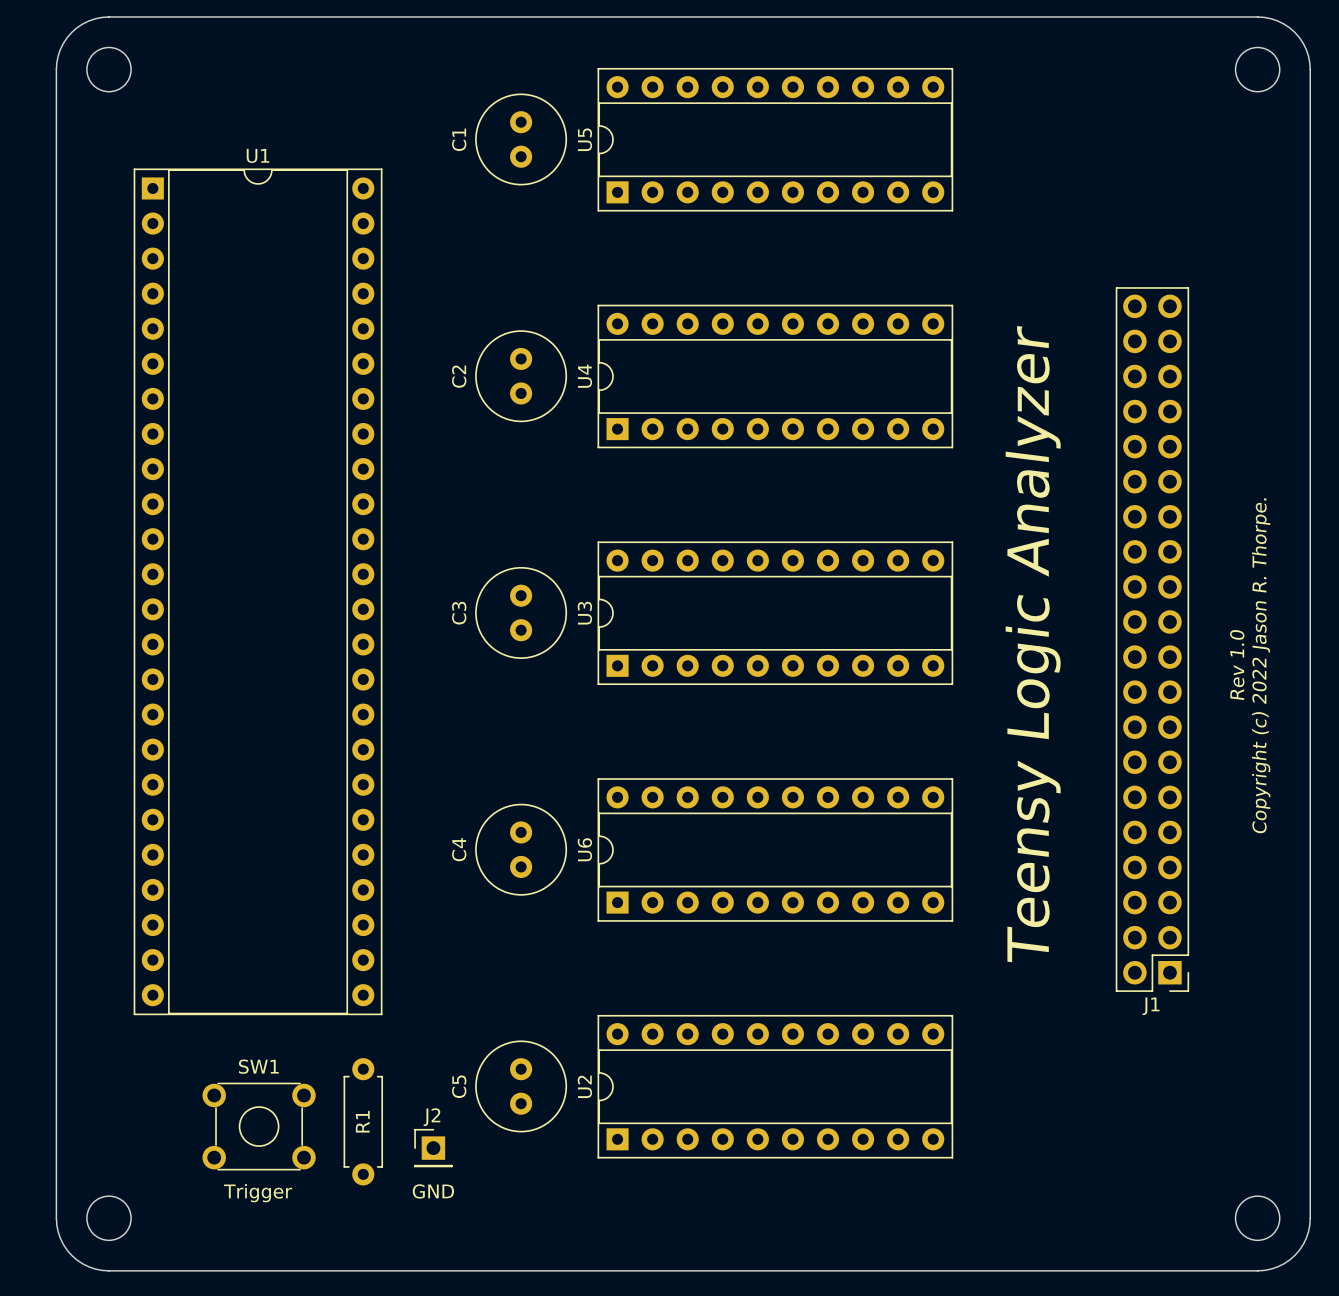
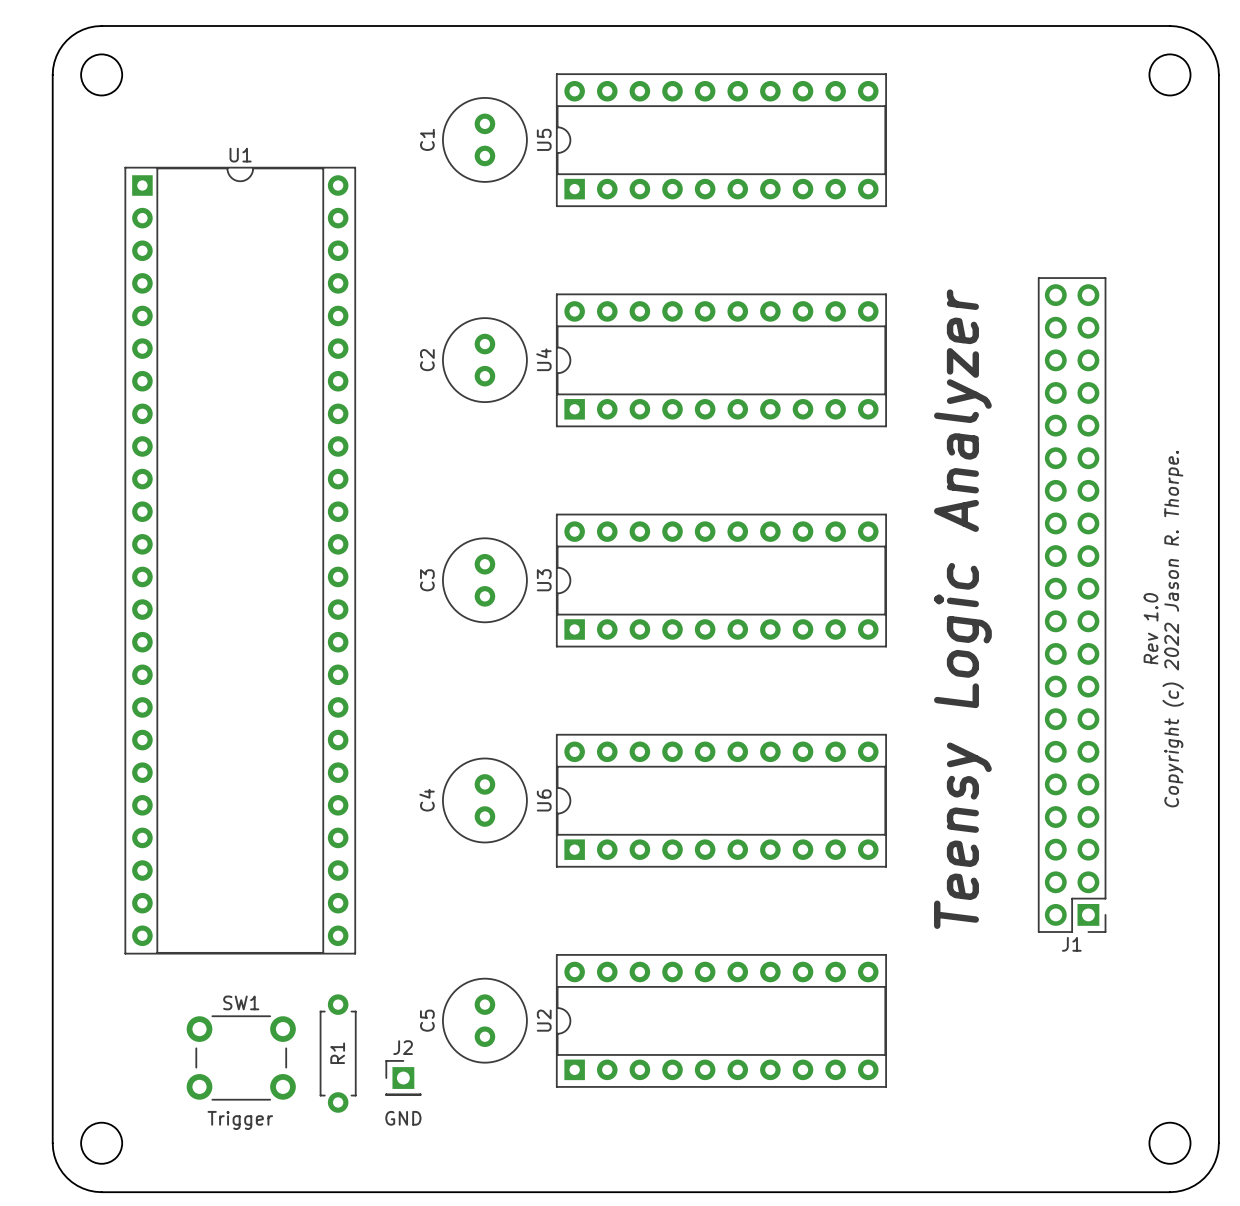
SW1 footprint: [202, 1082, 316, 1171] -> [186, 1015, 296, 1101]

